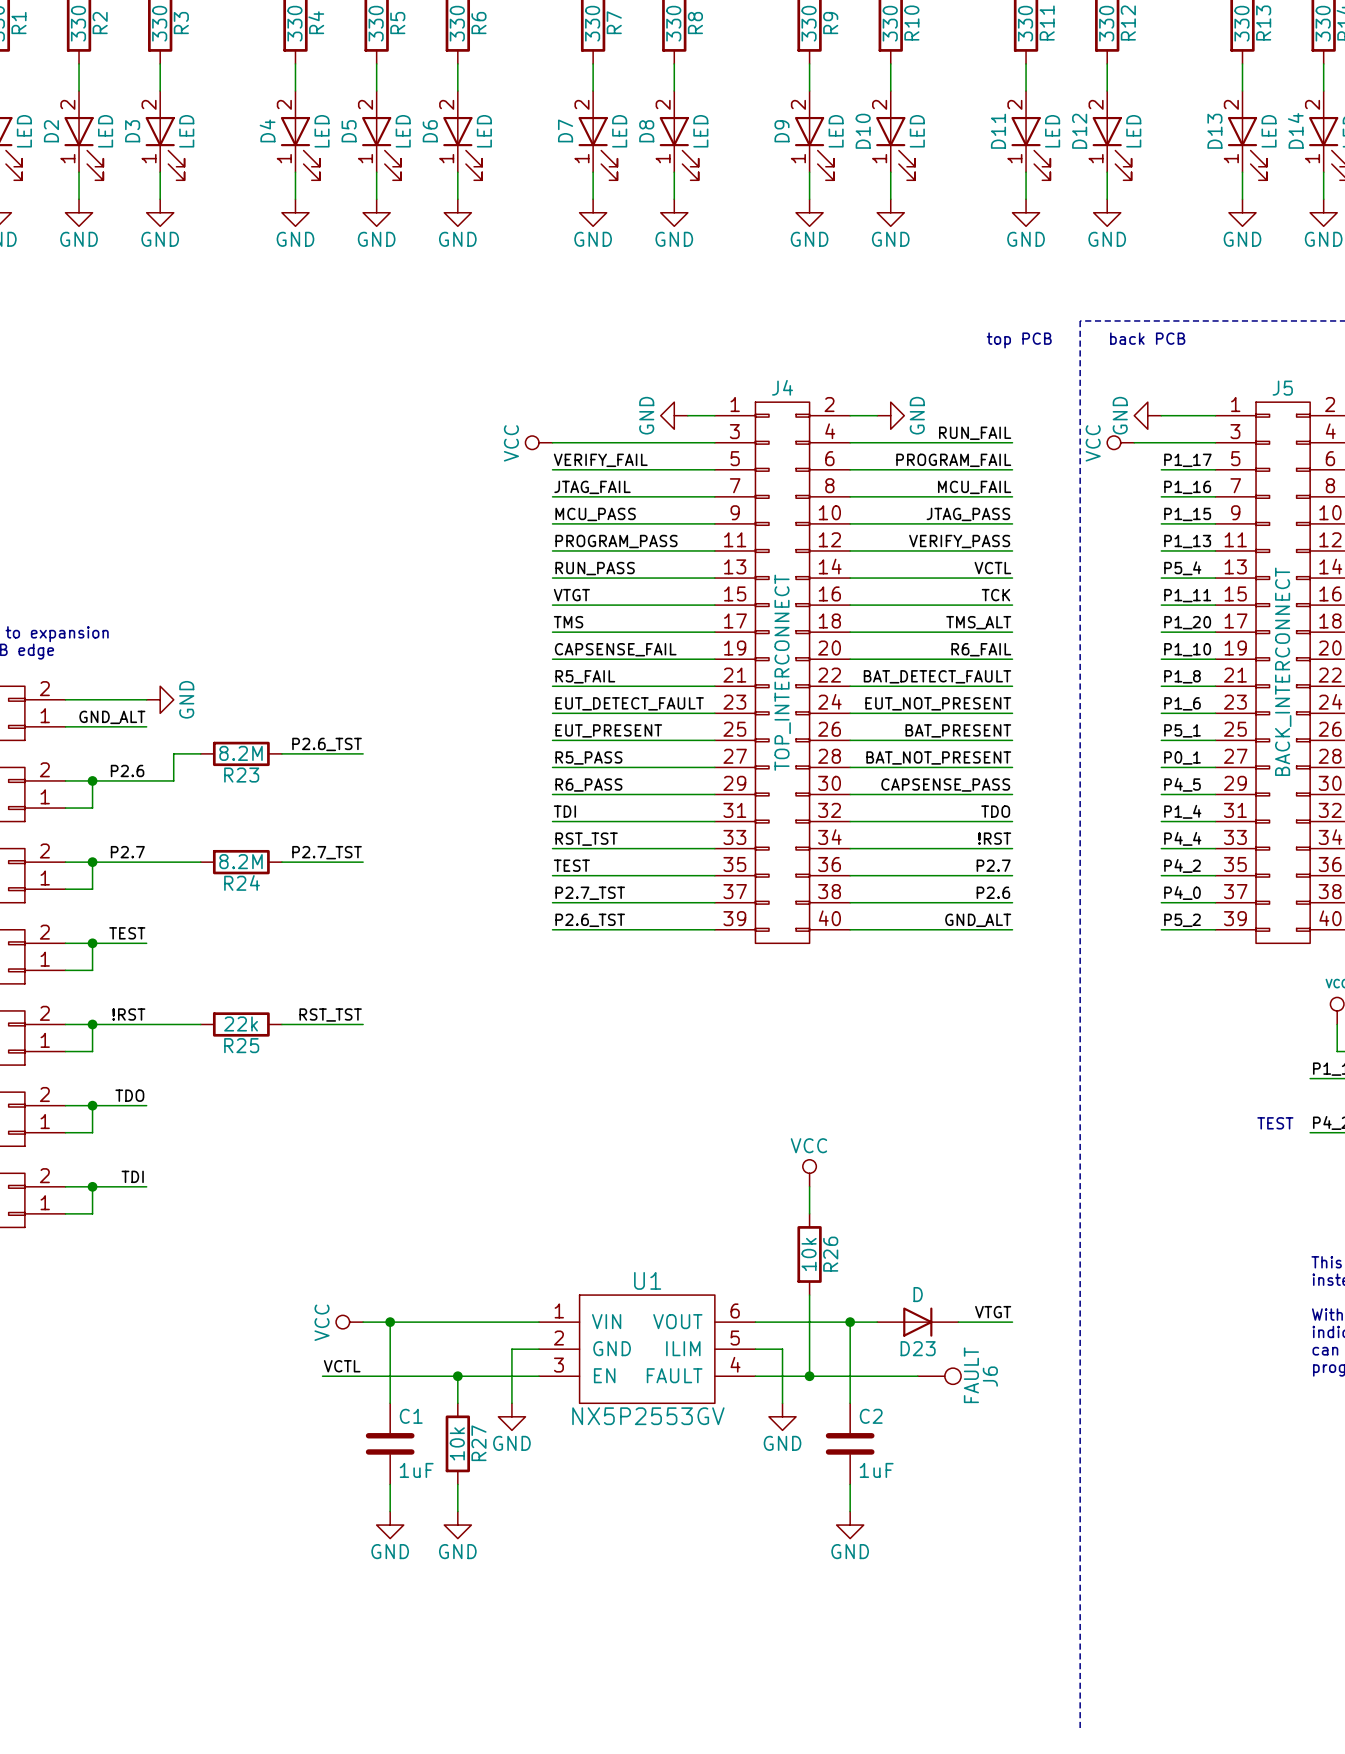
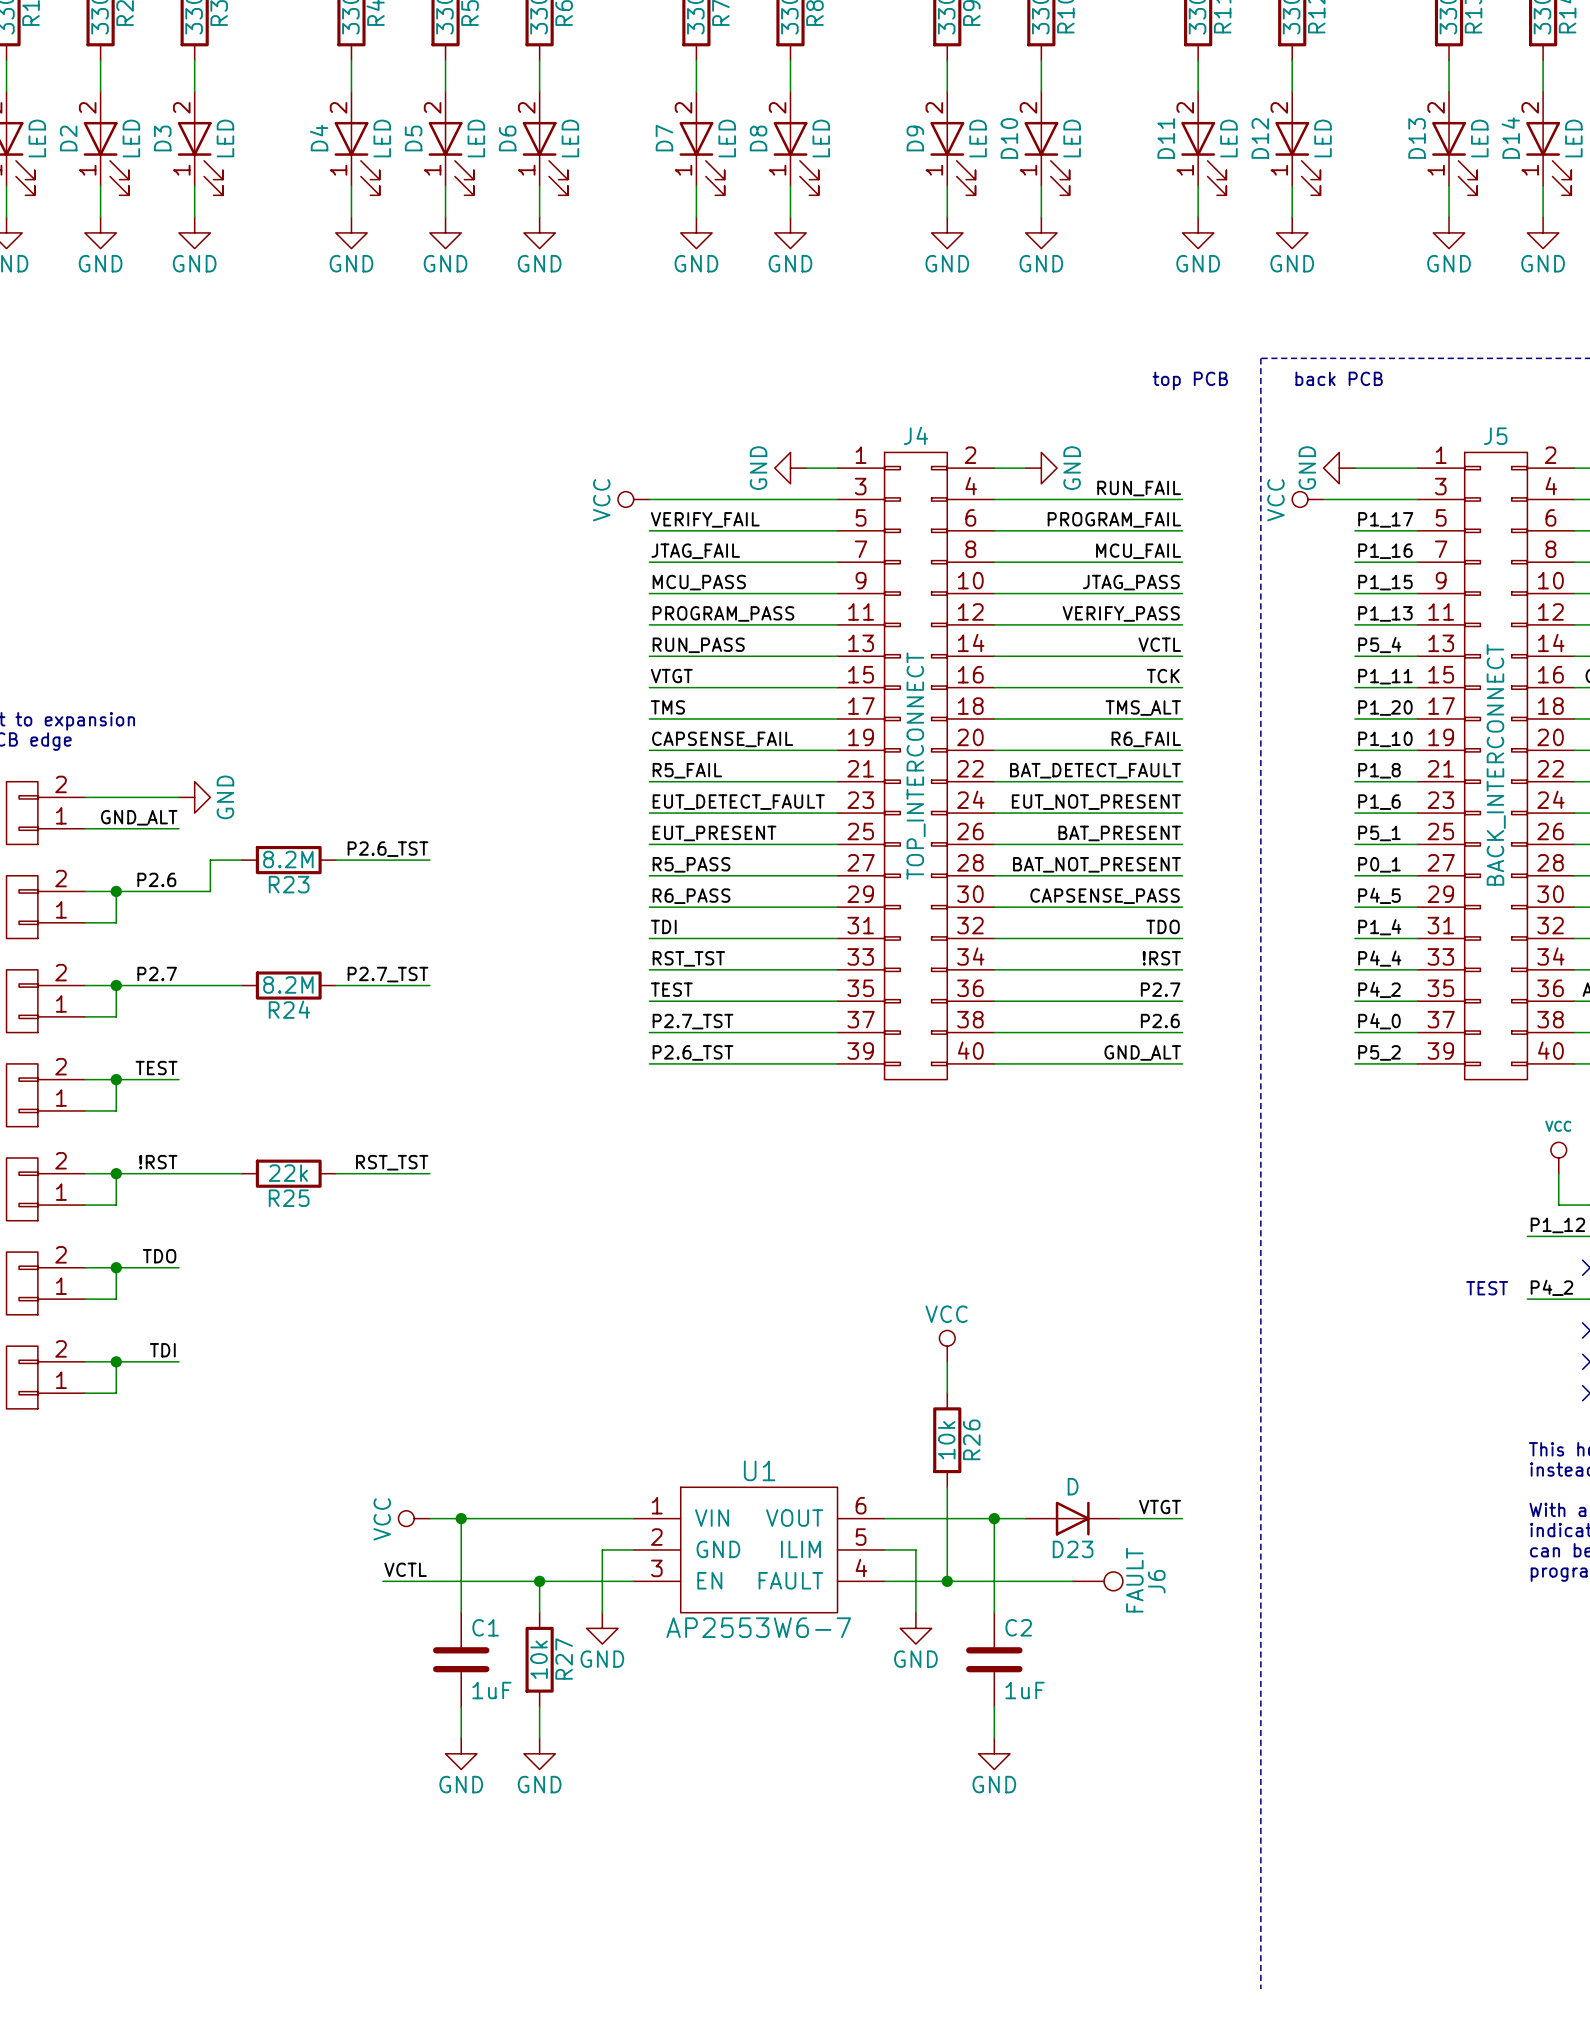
U1 value: NX5P2553GV (648, 1416) -> AP2553W6-7 (758, 1627)

